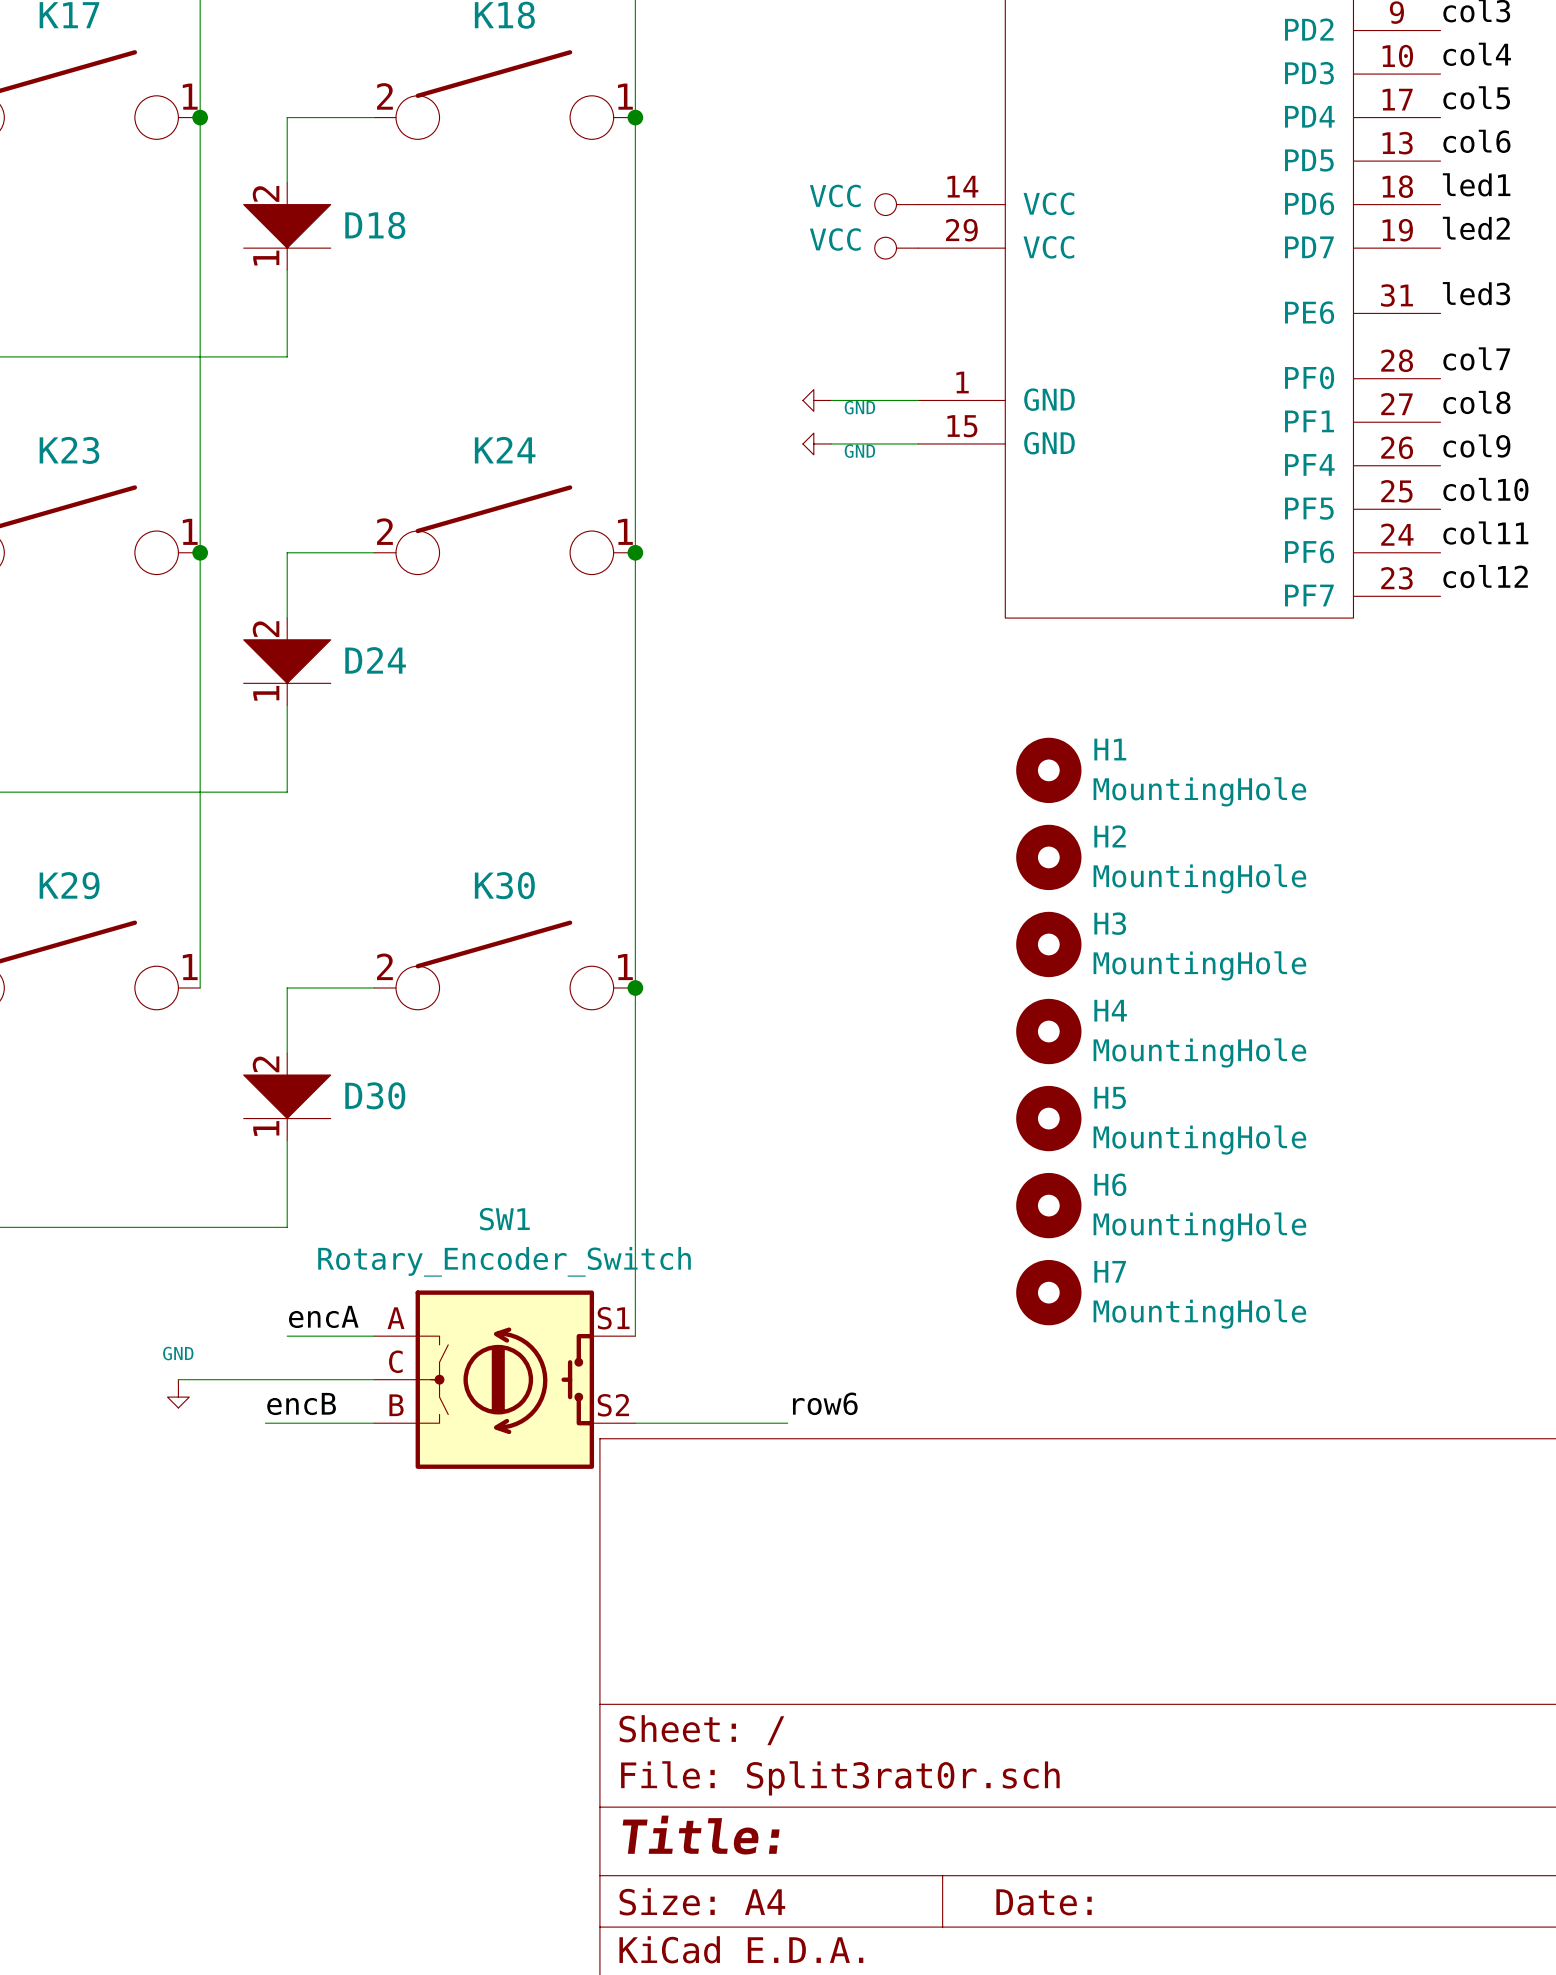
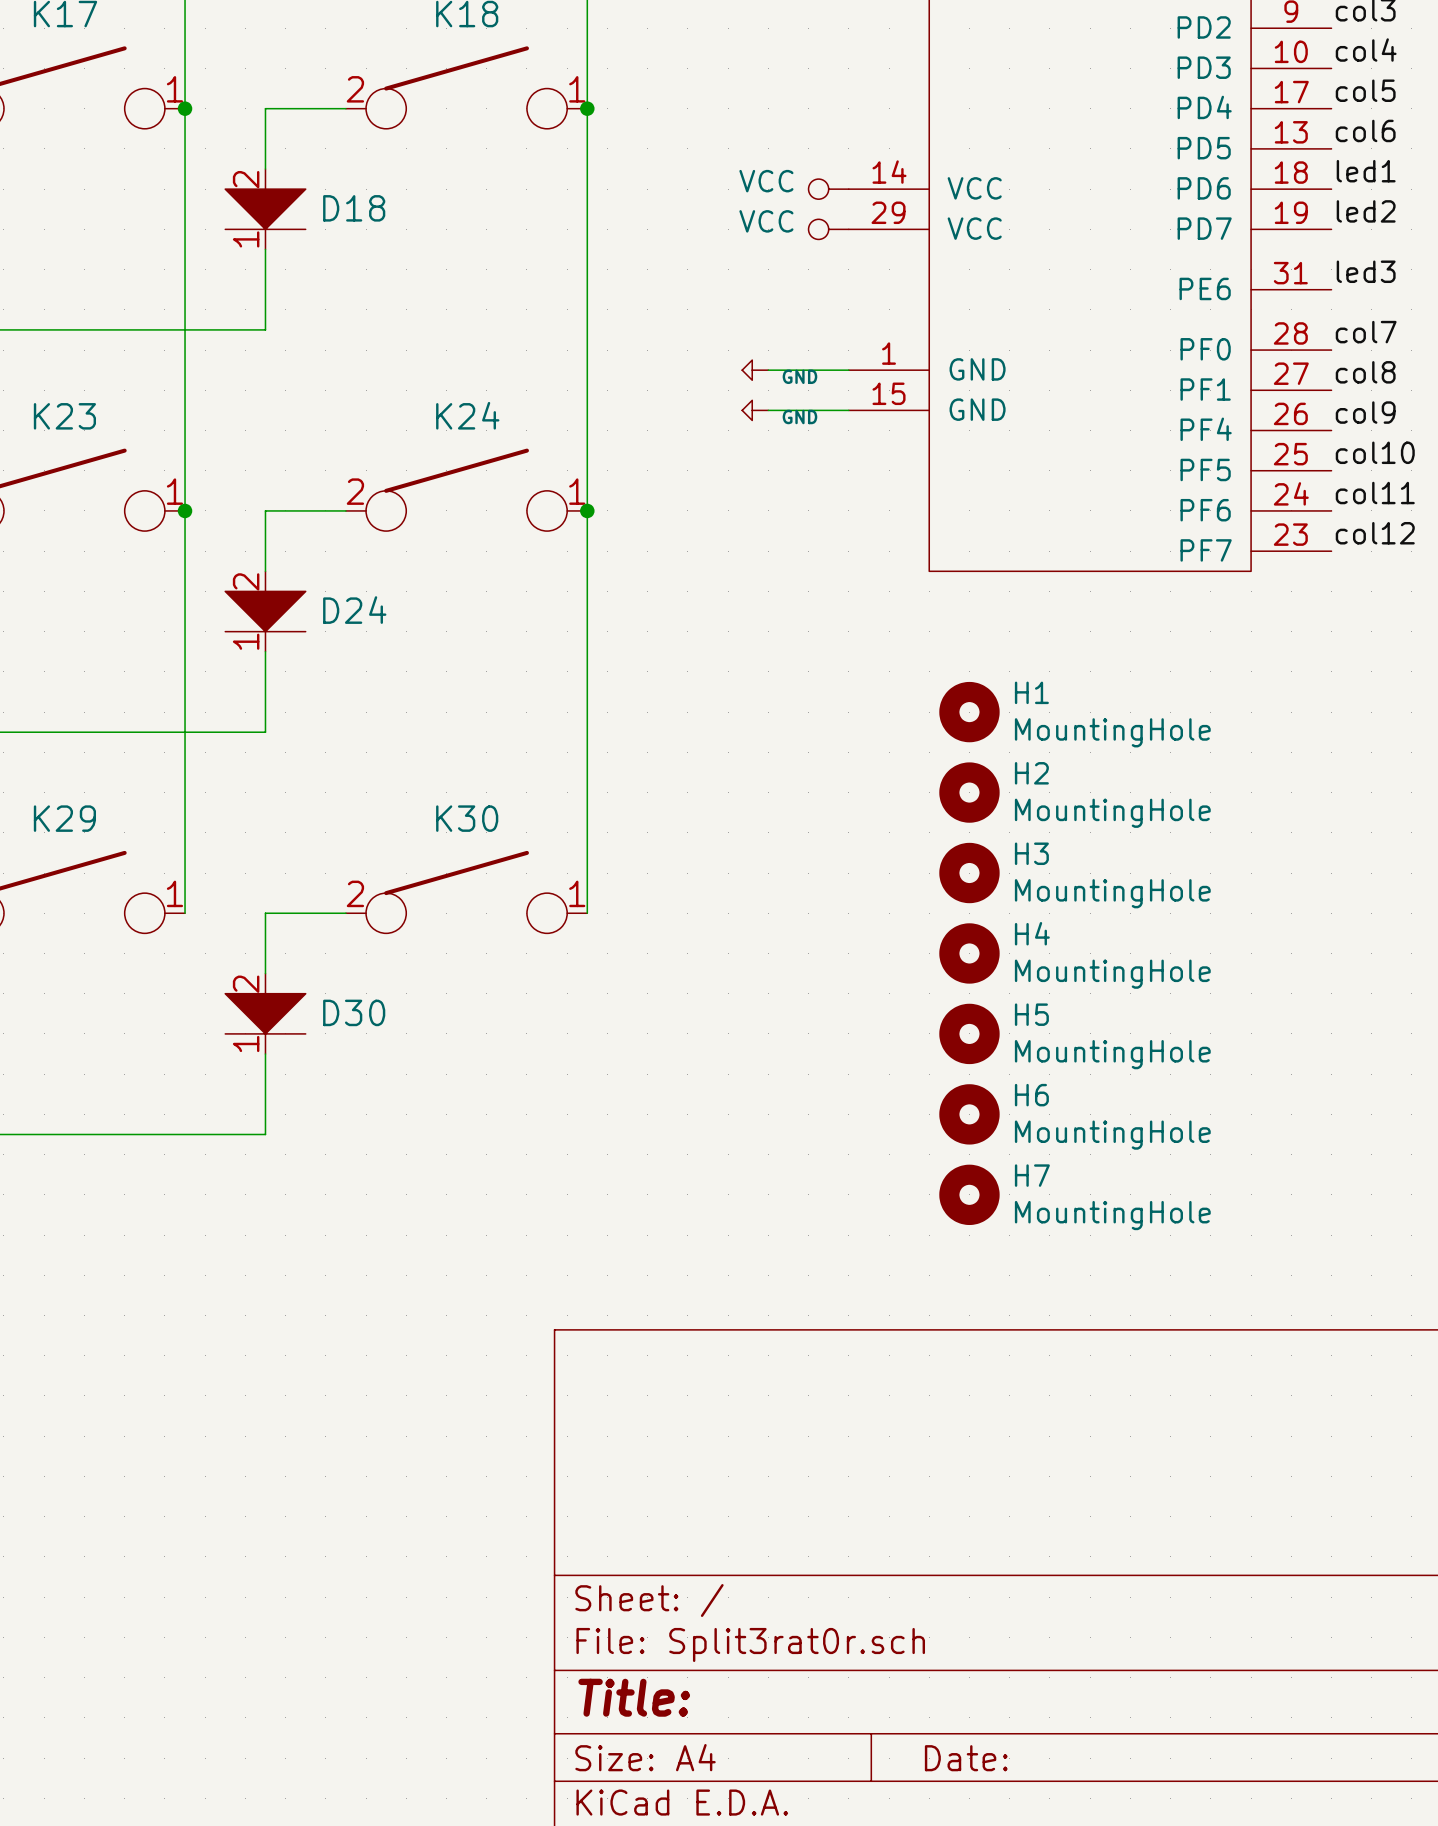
wire: (635, 987) (635, 1336) -> none
junction: (635, 987) -> none
label: encA (323, 1316) -> none
wire: (287, 1336) (374, 1336) -> none
wire: (178, 1379) (374, 1379) -> none
SW1: Rotary_Encoder_Switch (504, 1379) -> none
power symbol: GND (178, 1393) -> none
label: row6 (825, 1403) -> none
label: encB (301, 1404) -> none
wire: (265, 1423) (374, 1423) -> none
wire: (635, 1423) (787, 1423) -> none

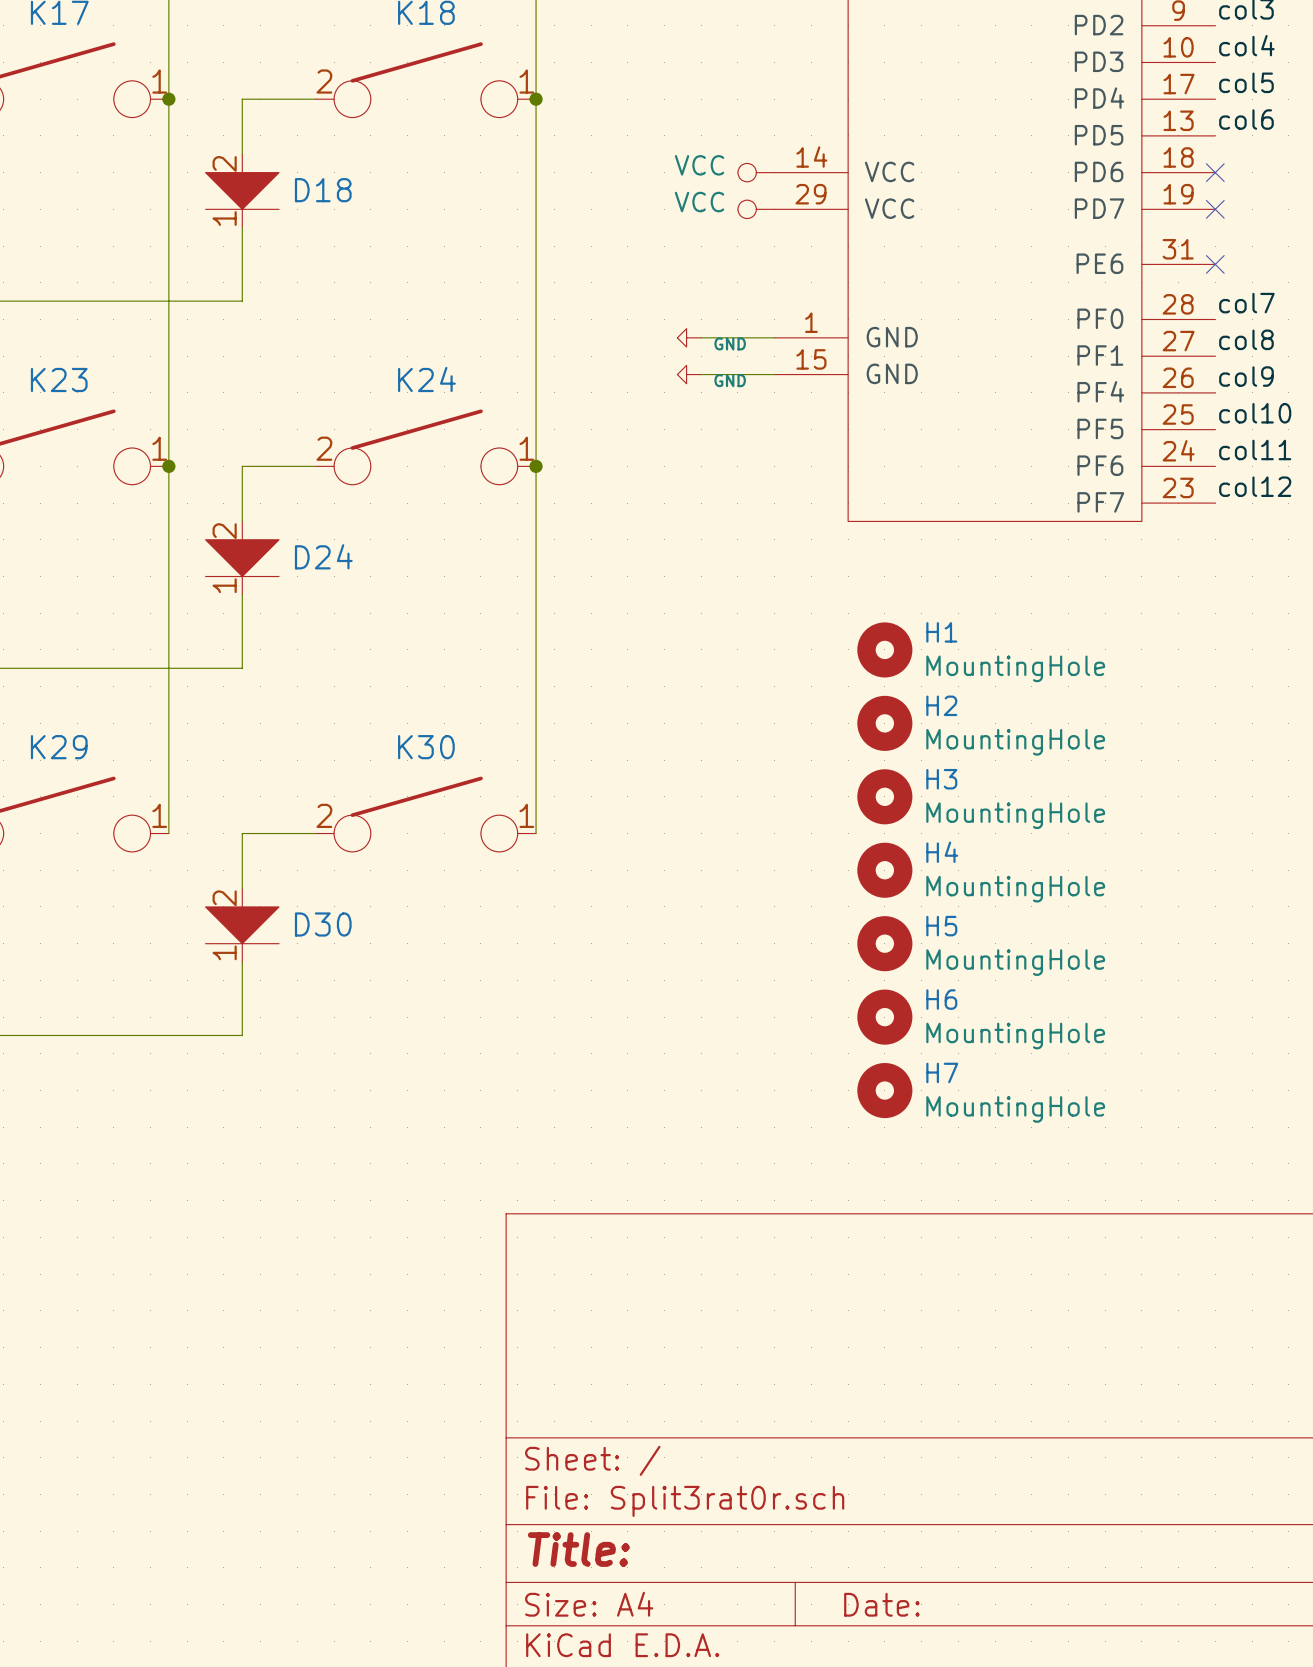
label: led1 (1366, 171) -> none
no-connect mark: none -> (1215, 172)
label: led2 (1366, 211) -> none
no-connect mark: none -> (1215, 209)
label: led3 (1366, 271) -> none
no-connect mark: none -> (1215, 264)

